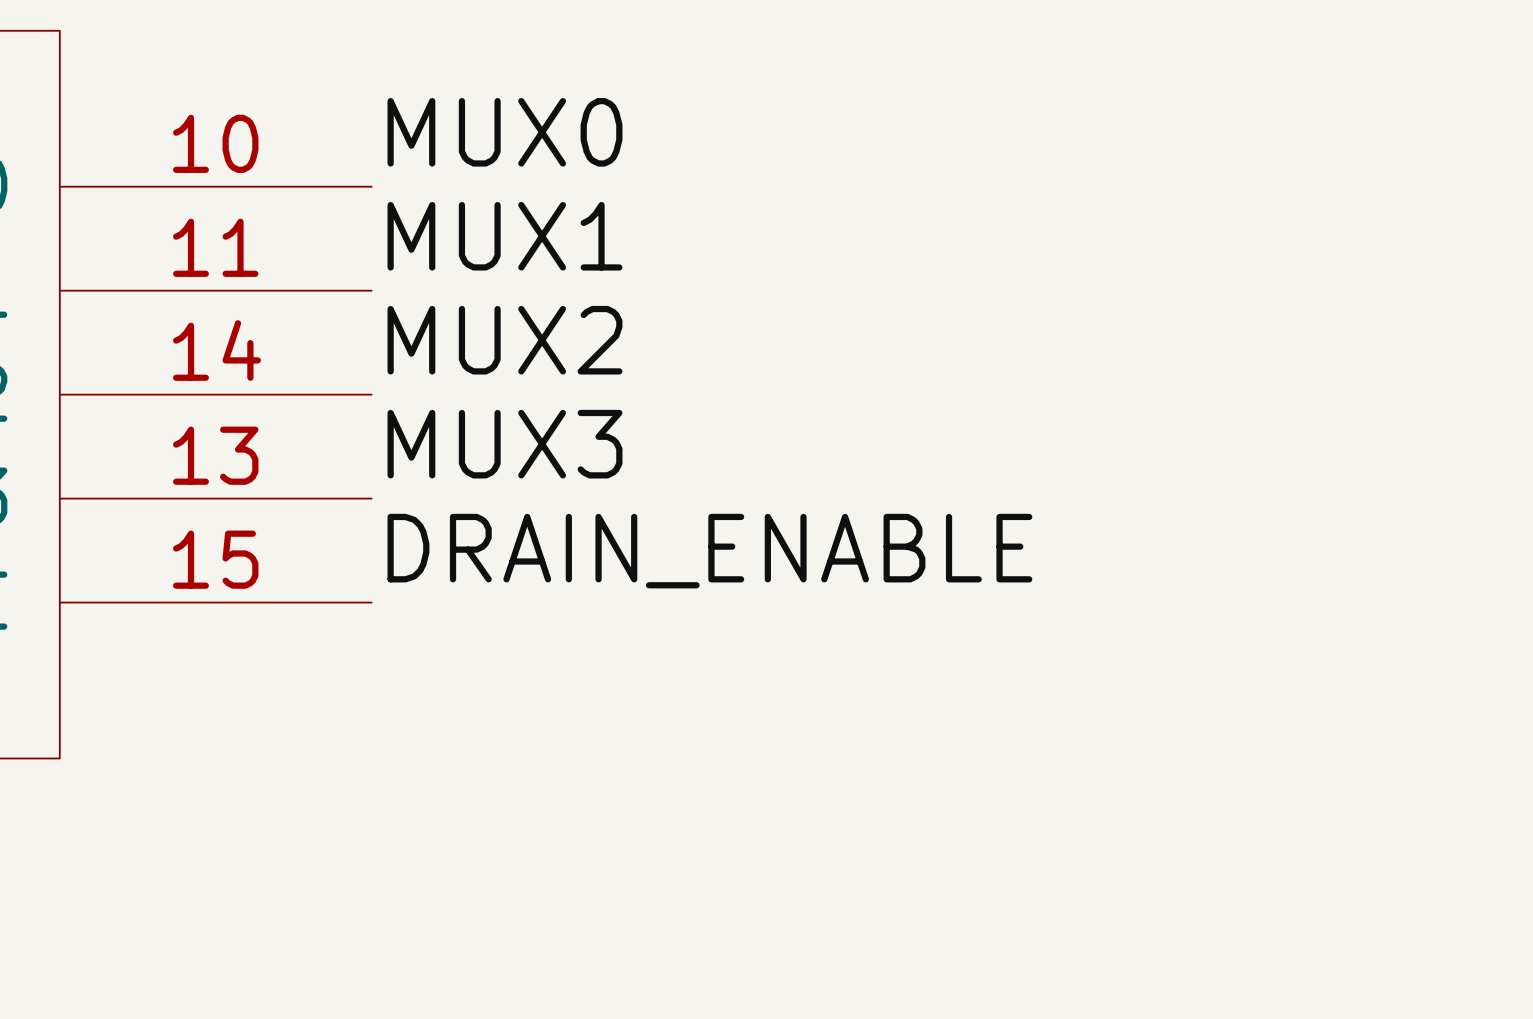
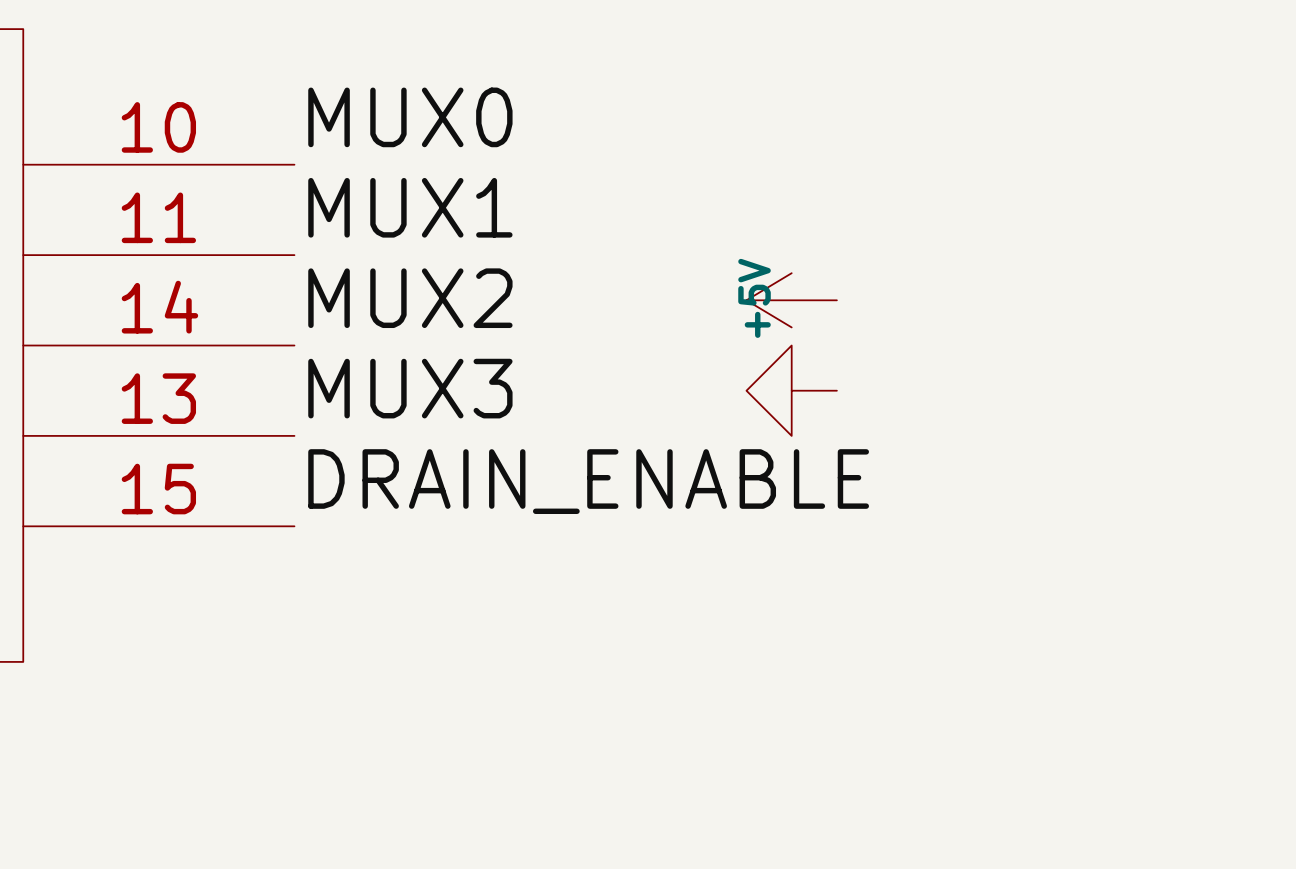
power symbol: none -> +5V (791, 300)
power symbol: none -> (791, 390)

